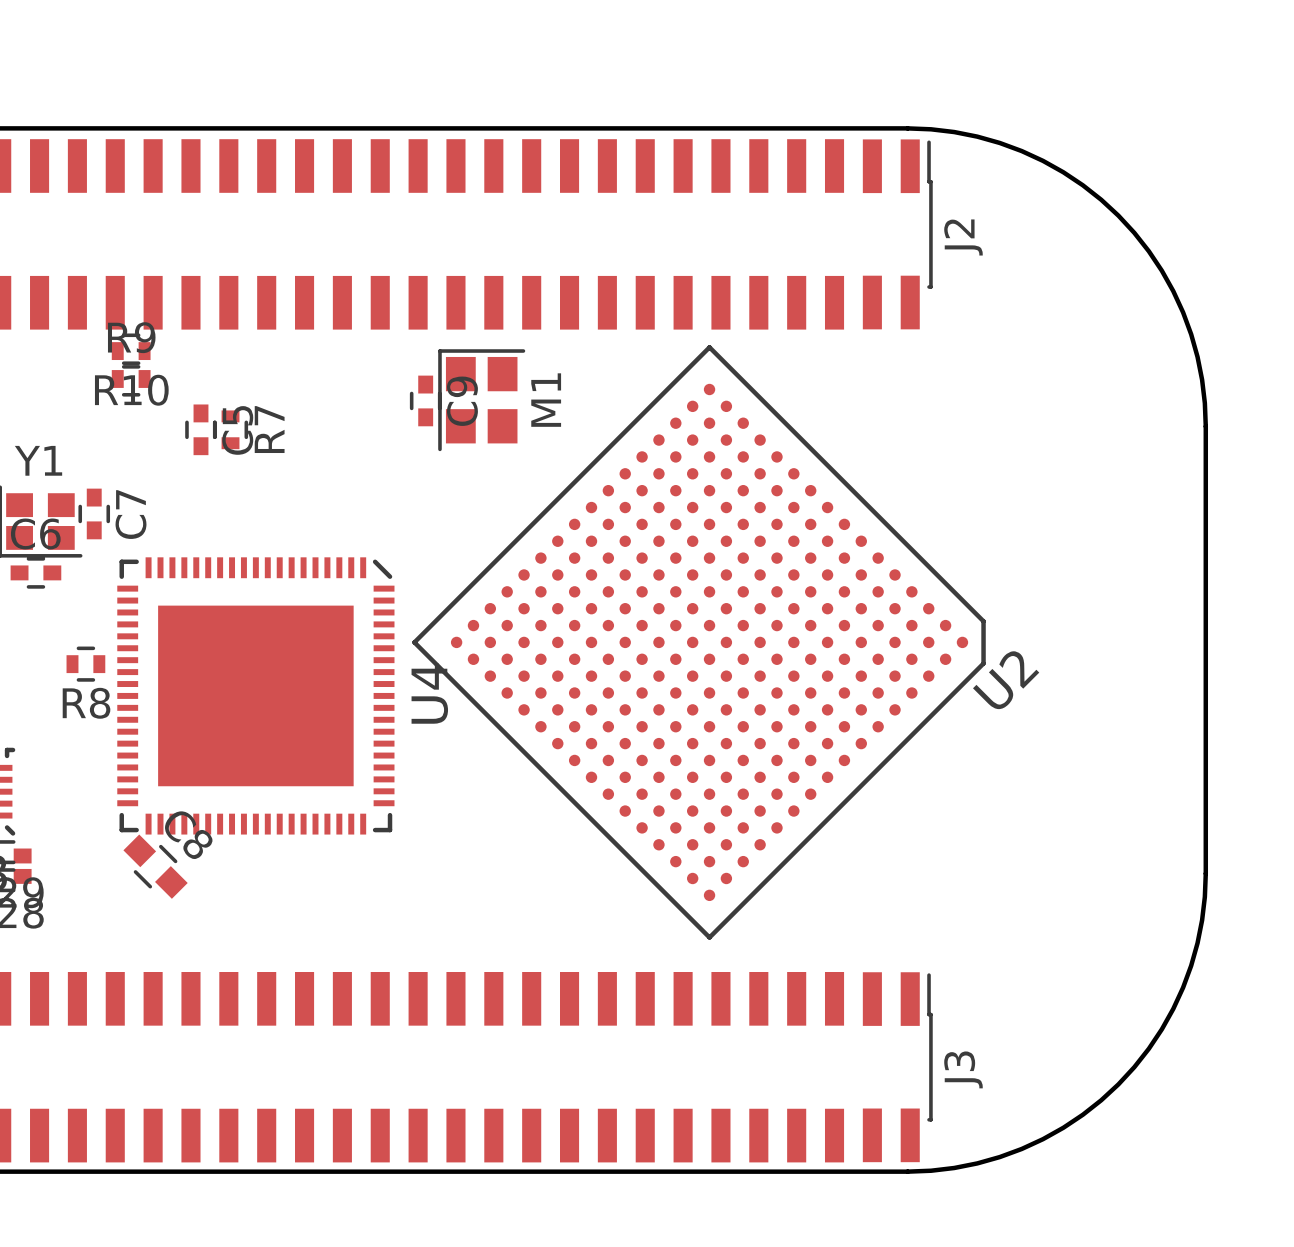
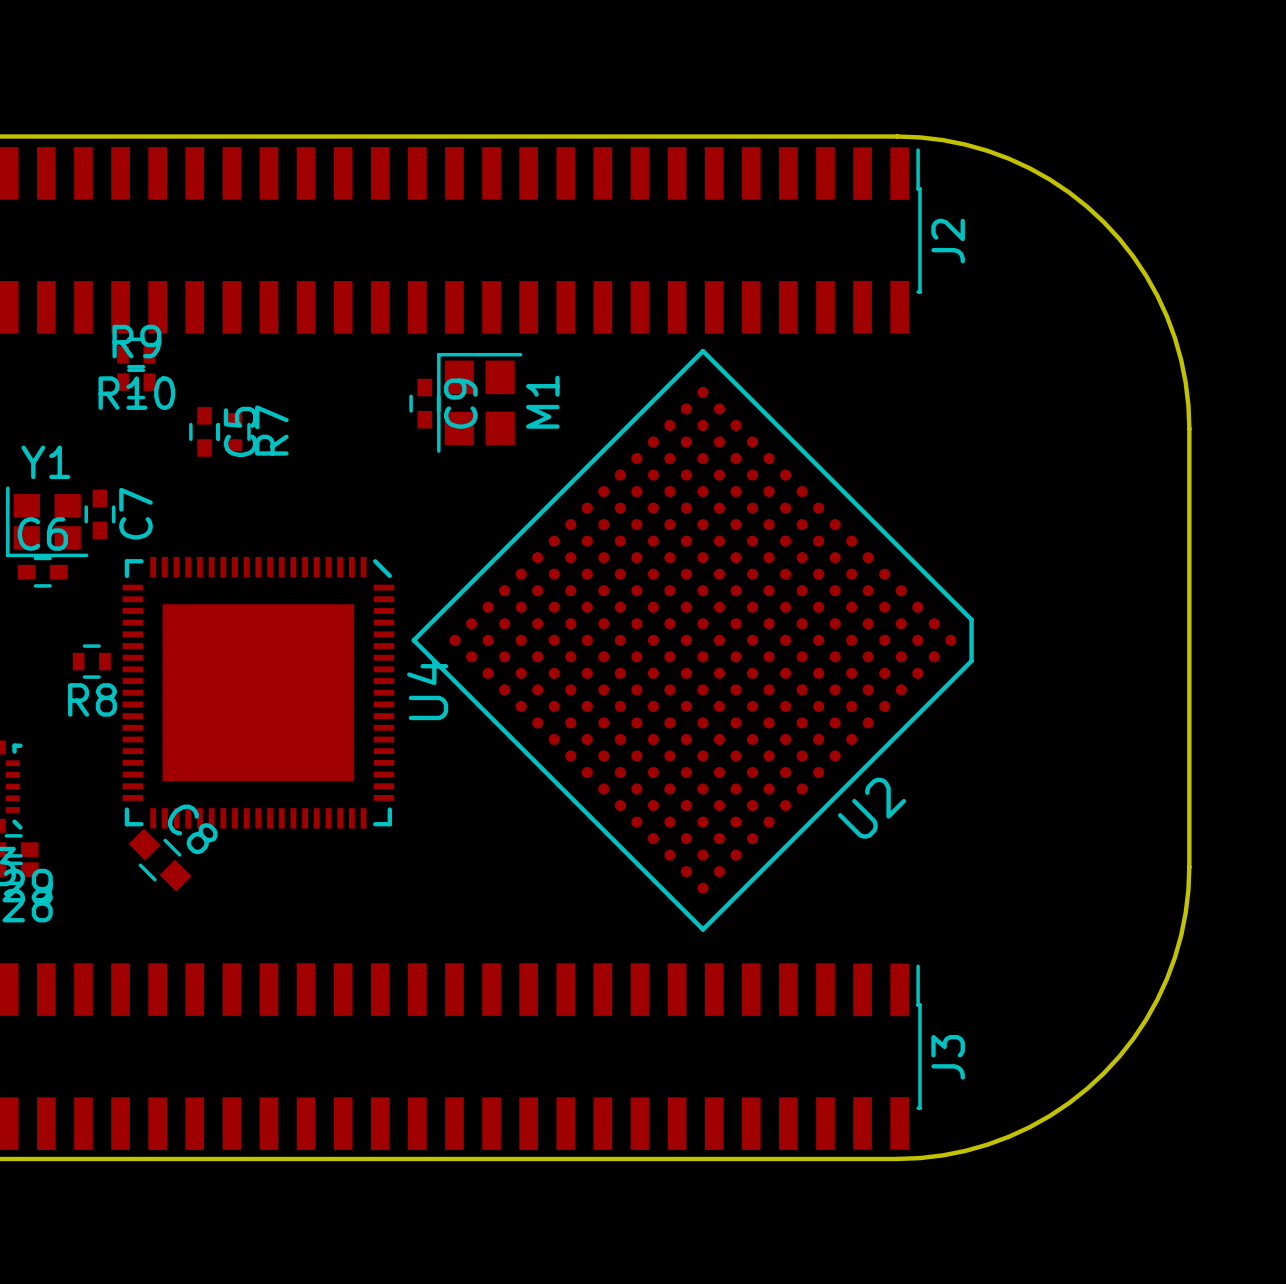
U2 name position: U2 (1006, 680) -> U2 (872, 808)

